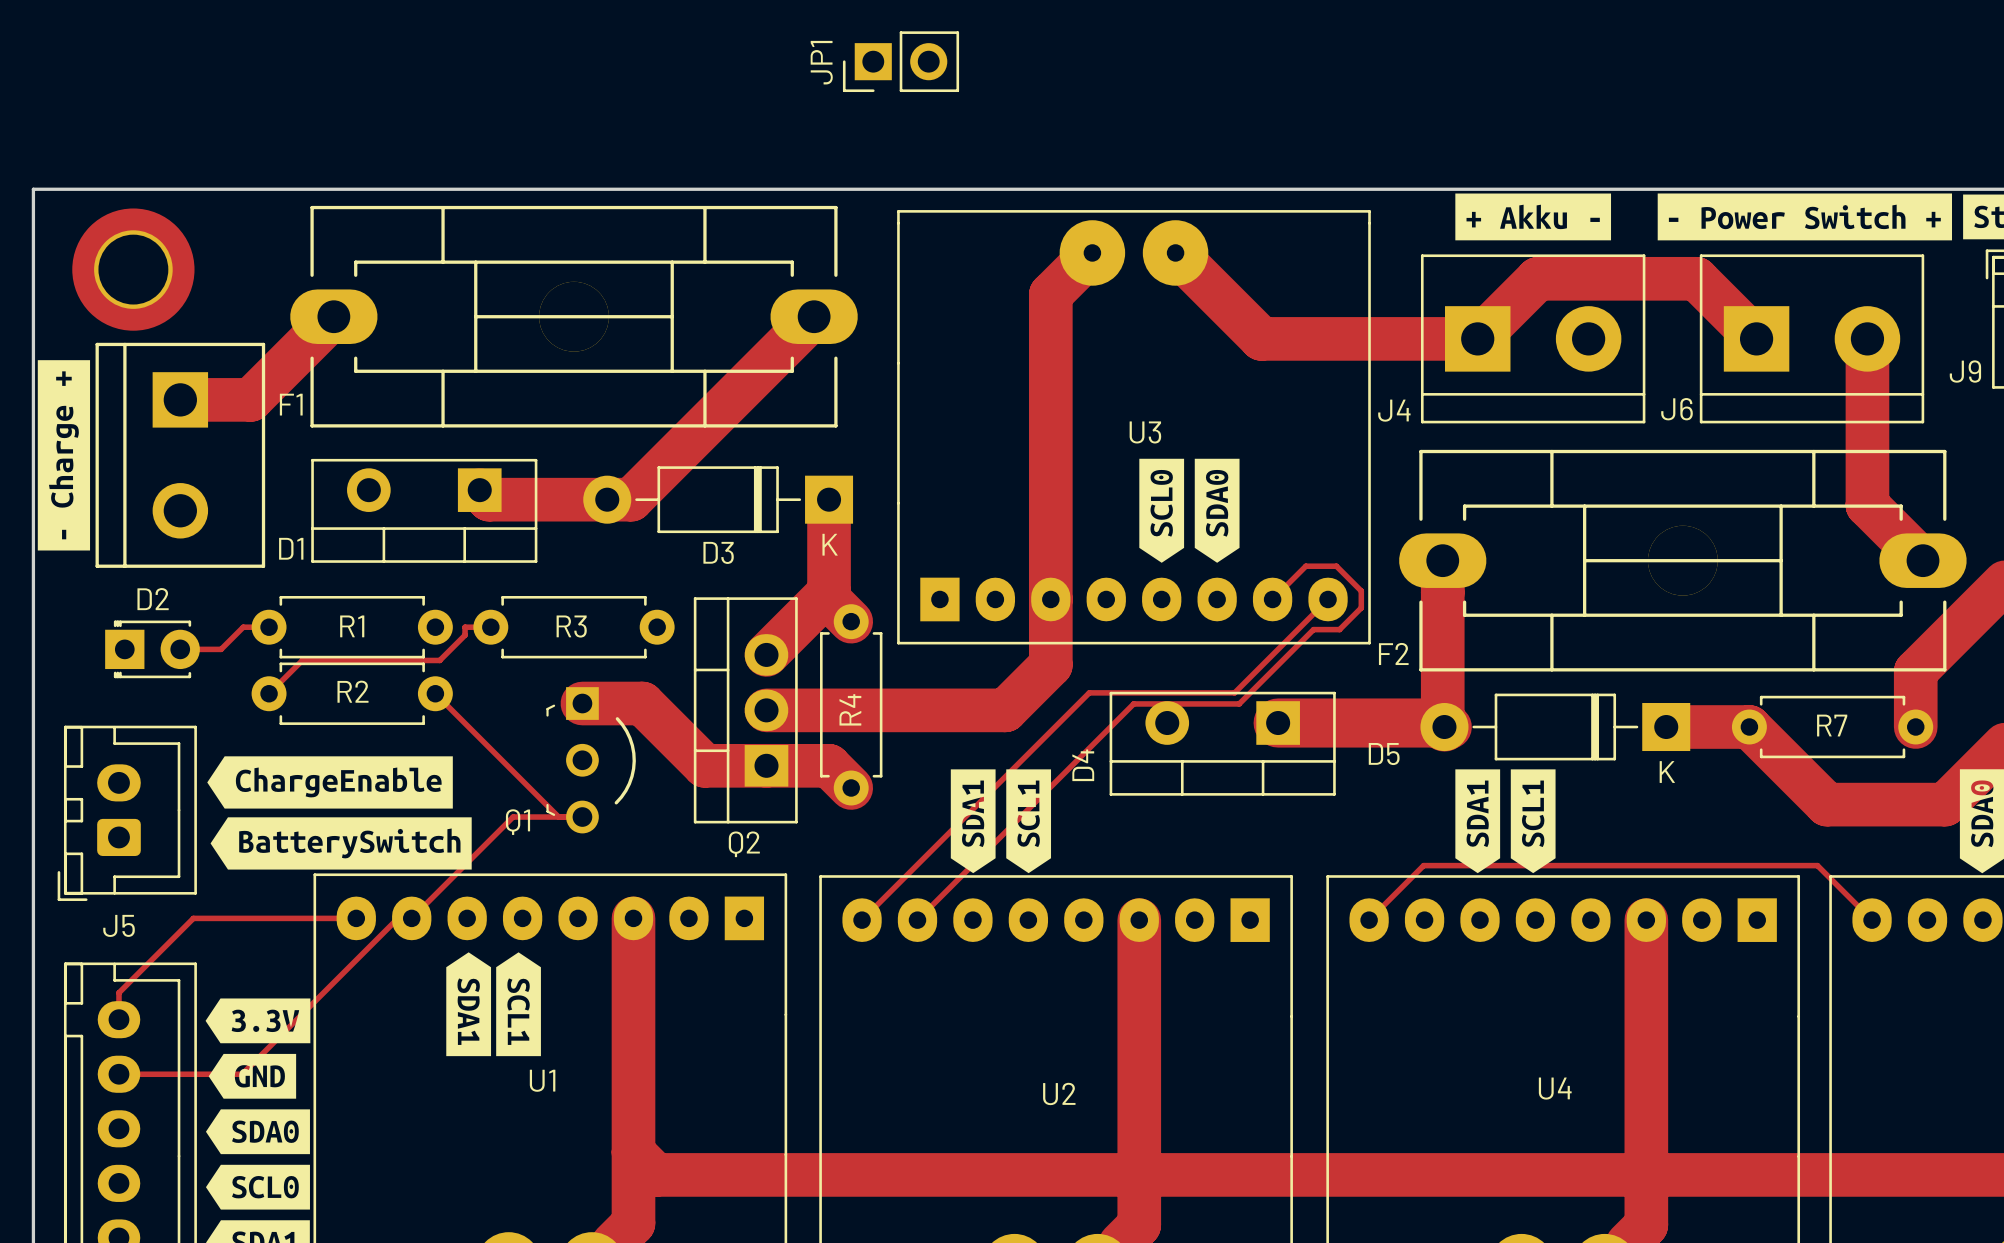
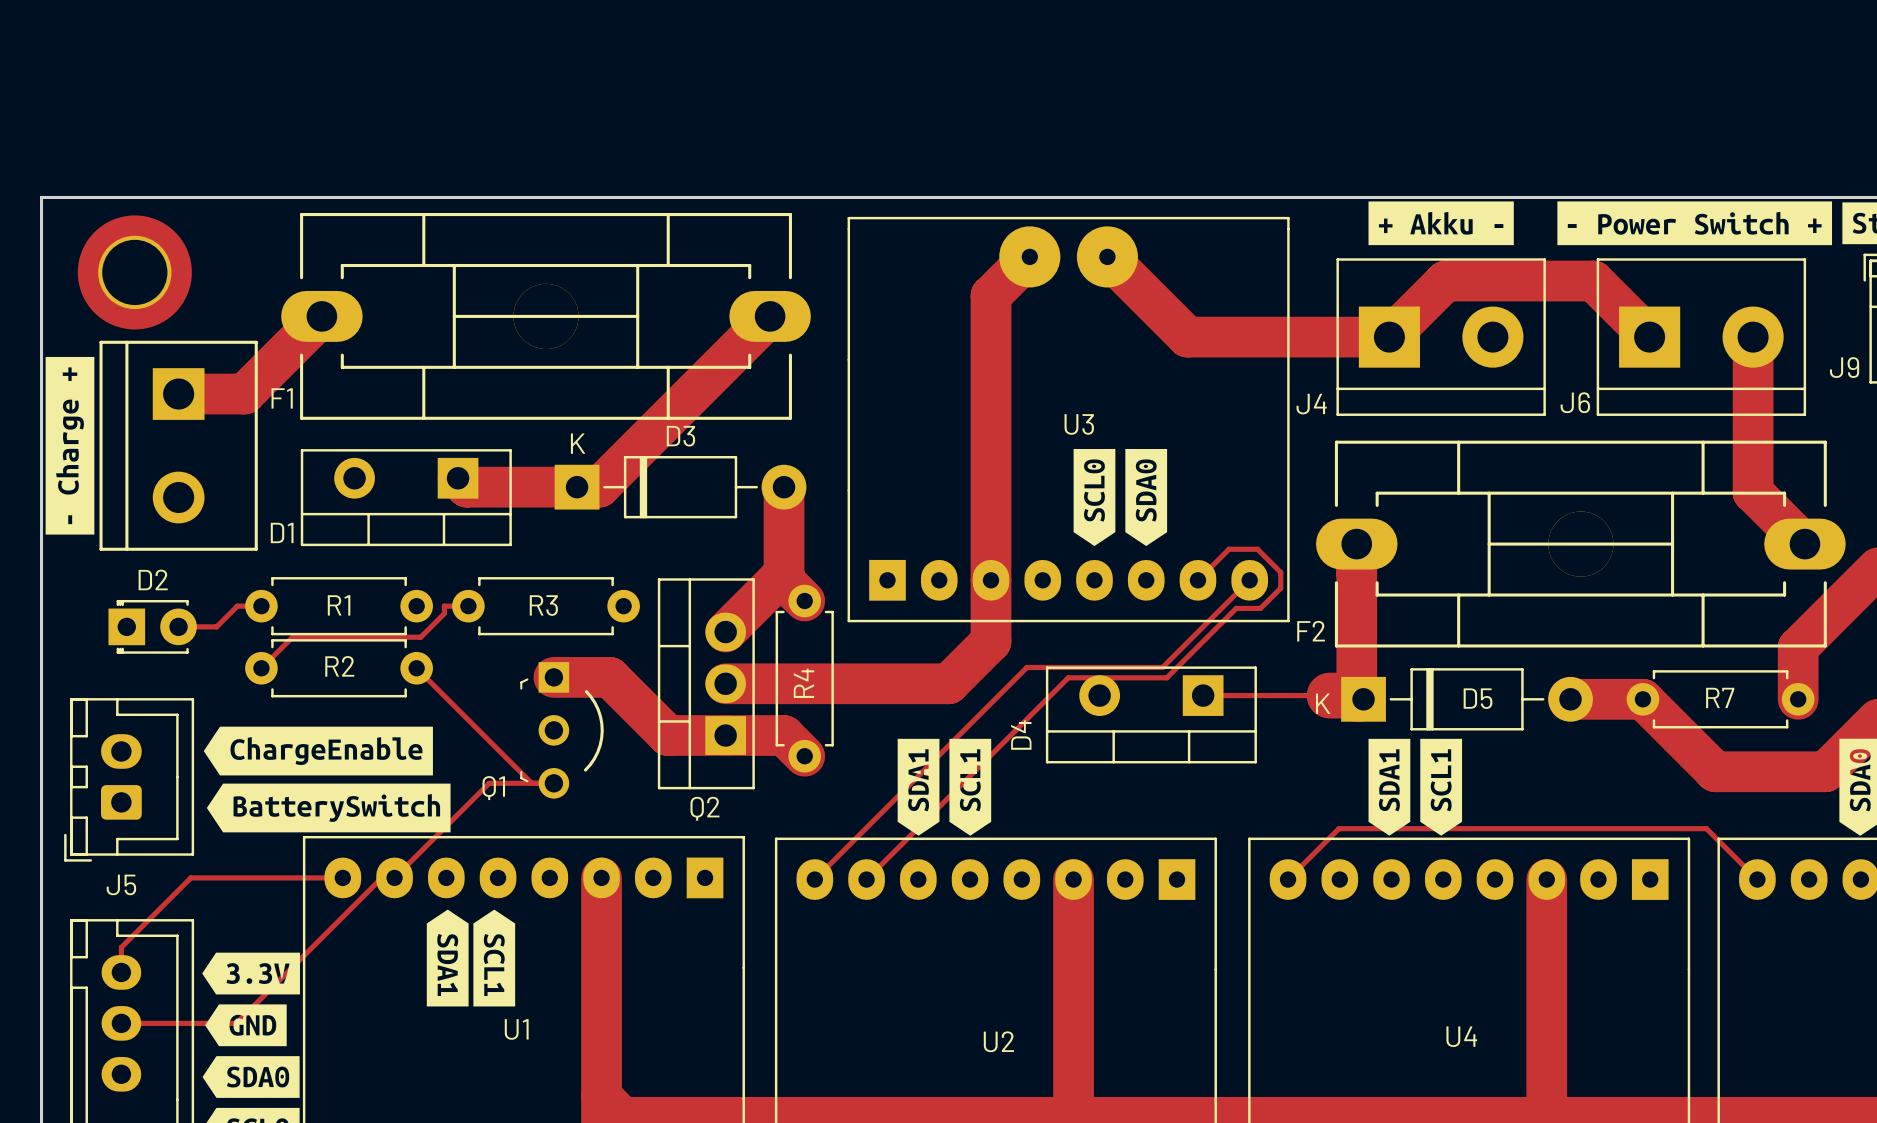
JP1: (901, 61) -> none
D3 rotation: 0° (718, 499) -> 180° (680, 487)
D5 footprint: [1420, 693, 1691, 761] -> [1341, 668, 1593, 731]
track width: thick (1278, 723) (1413, 723) -> thin (1203, 695) (1329, 695)
D5 name position: D5 (1384, 754) -> D5 (1478, 698)

